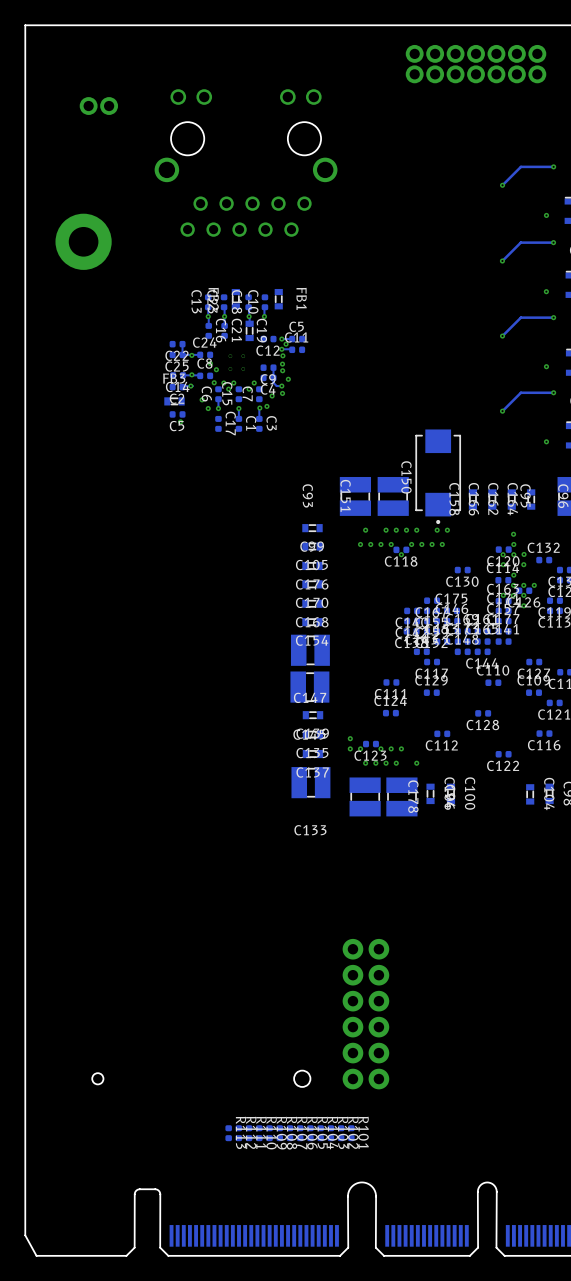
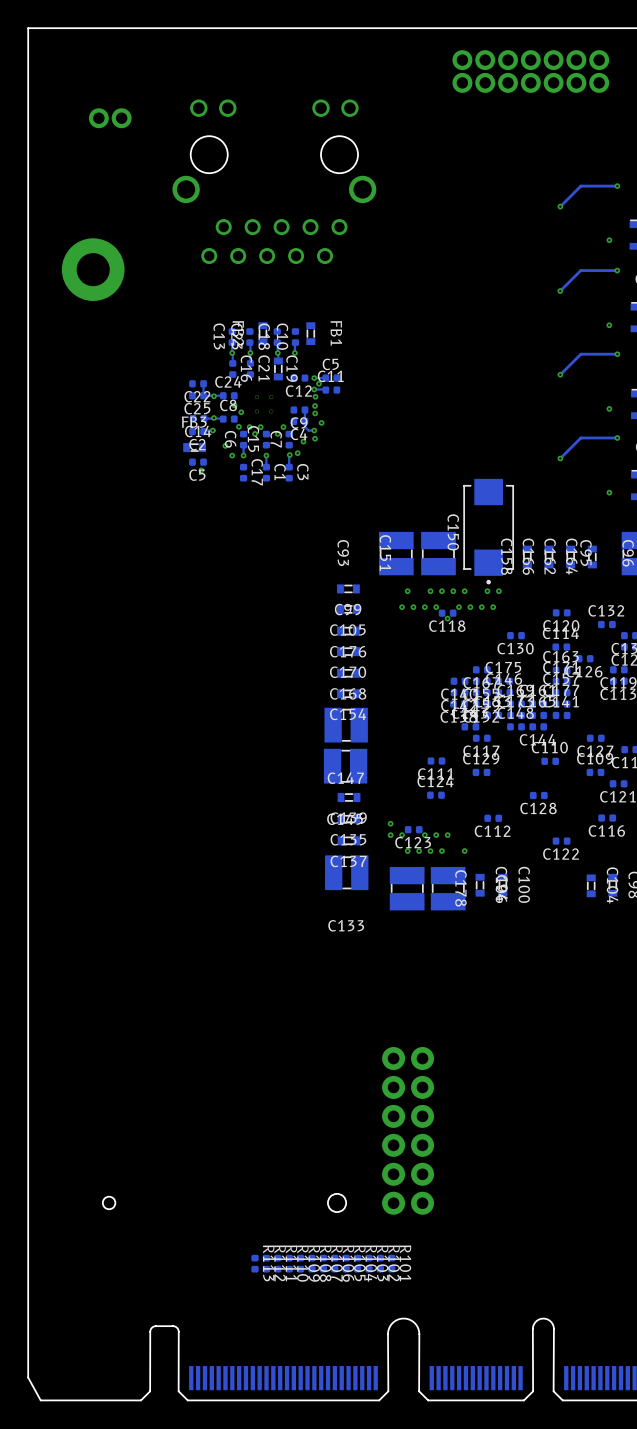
via: (513, 534) -> none
via: (513, 544) -> none
via: (503, 554) -> none
via: (513, 554) -> none
via: (524, 554) -> none
via: (503, 564) -> none
via: (523, 564) -> none
via: (513, 575) -> none
via: (513, 585) -> none
via: (523, 585) -> none
via: (534, 585) -> none
via: (503, 595) -> none
via: (513, 595) -> none
via: (523, 595) -> none
via: (523, 605) -> none

